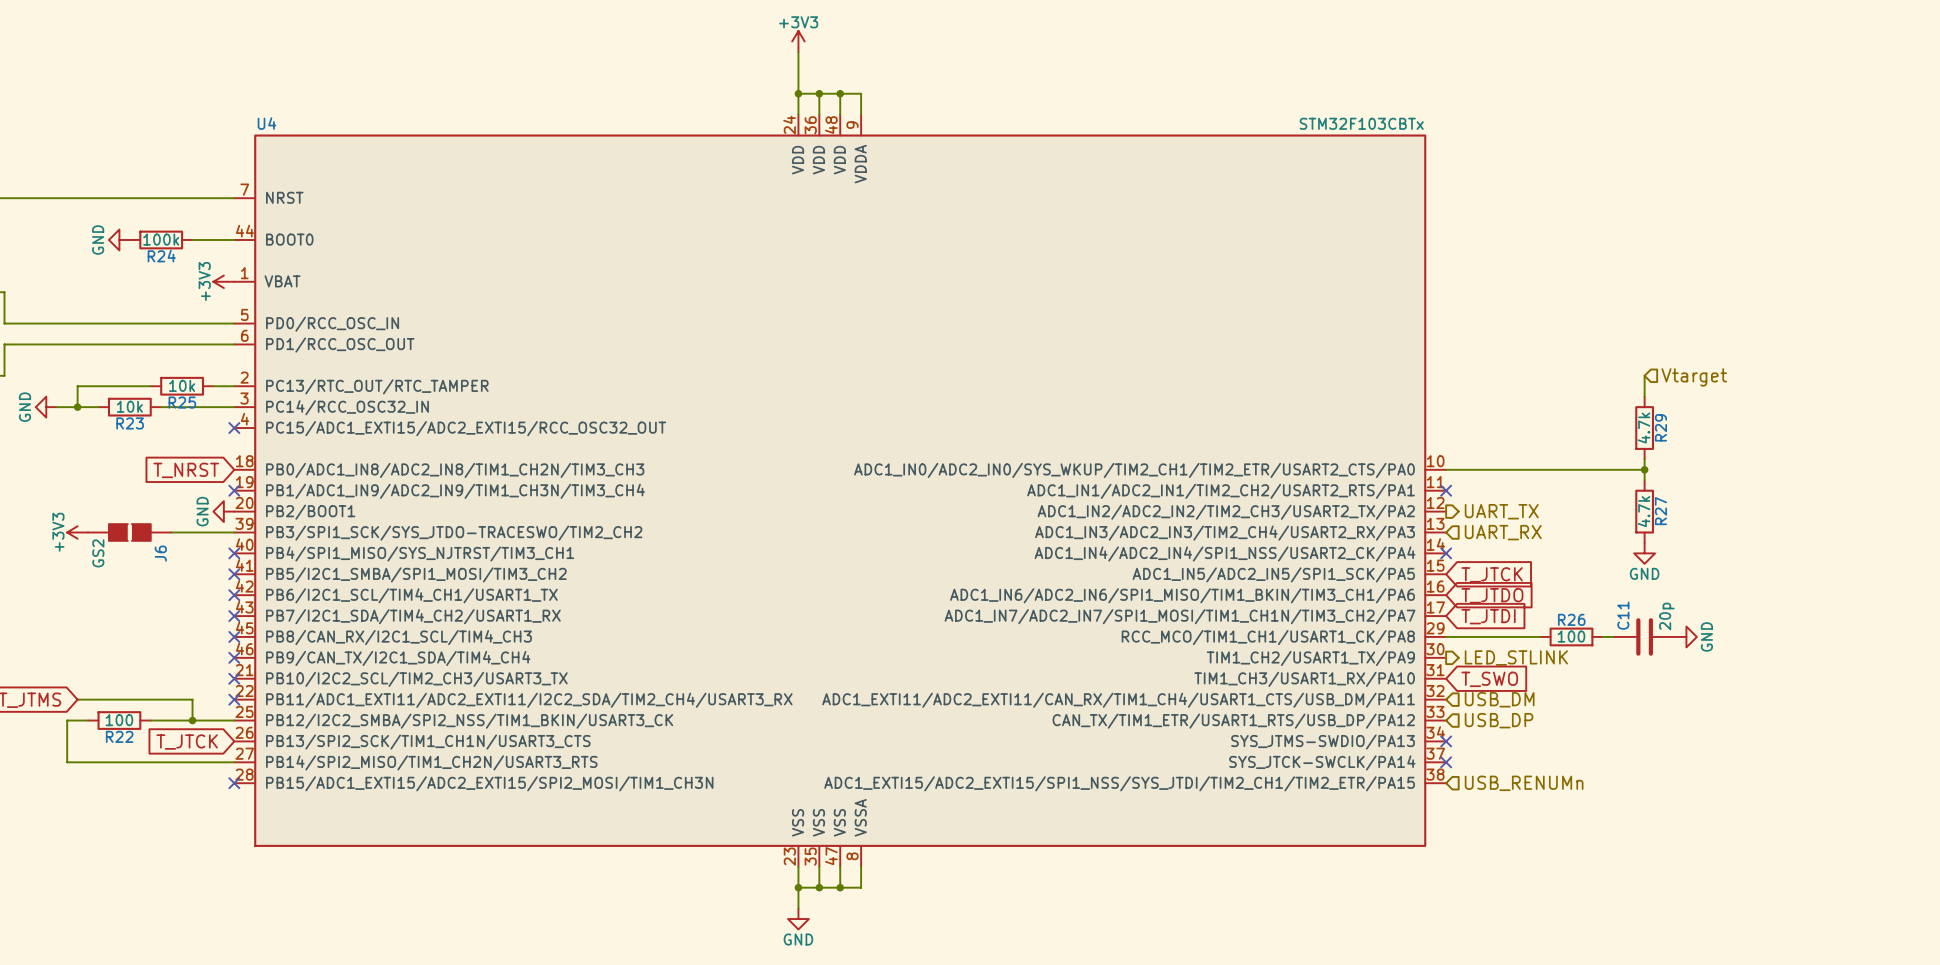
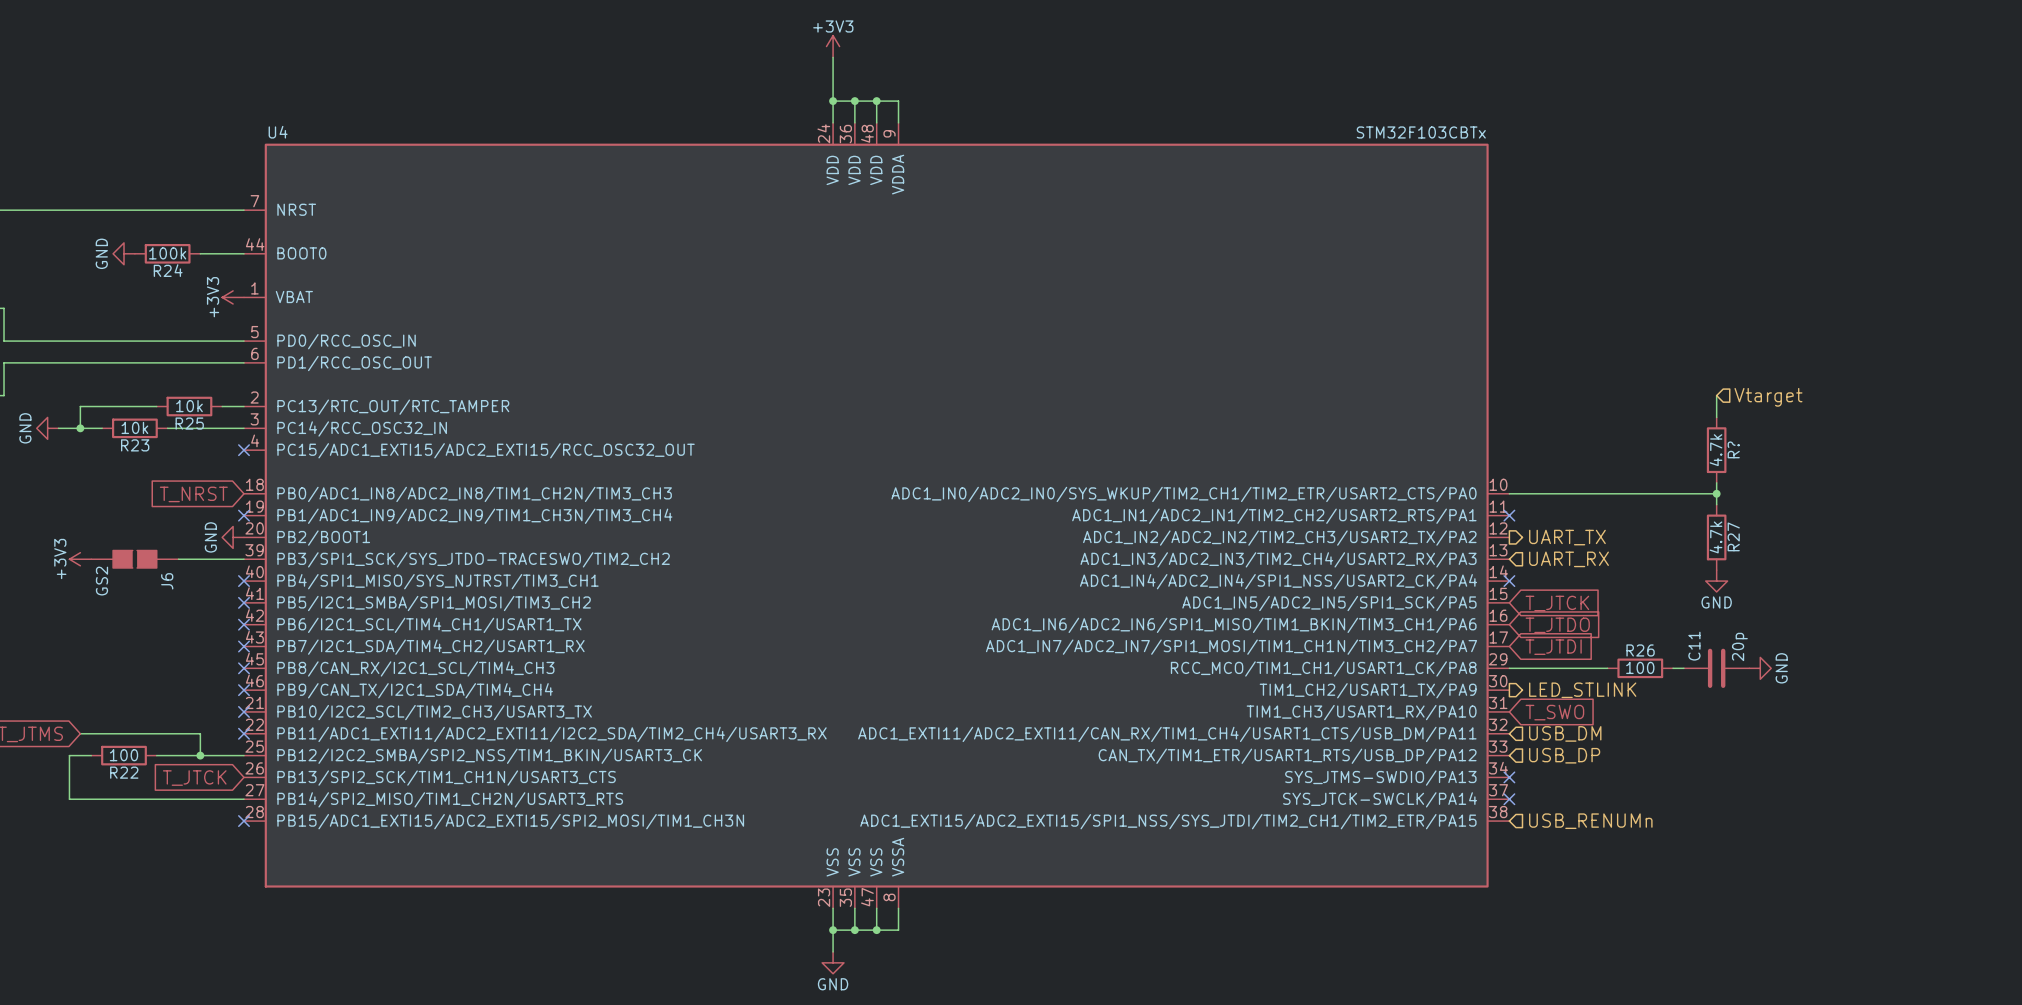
R29 name: R29 (1660, 427) -> R? (1733, 449)

